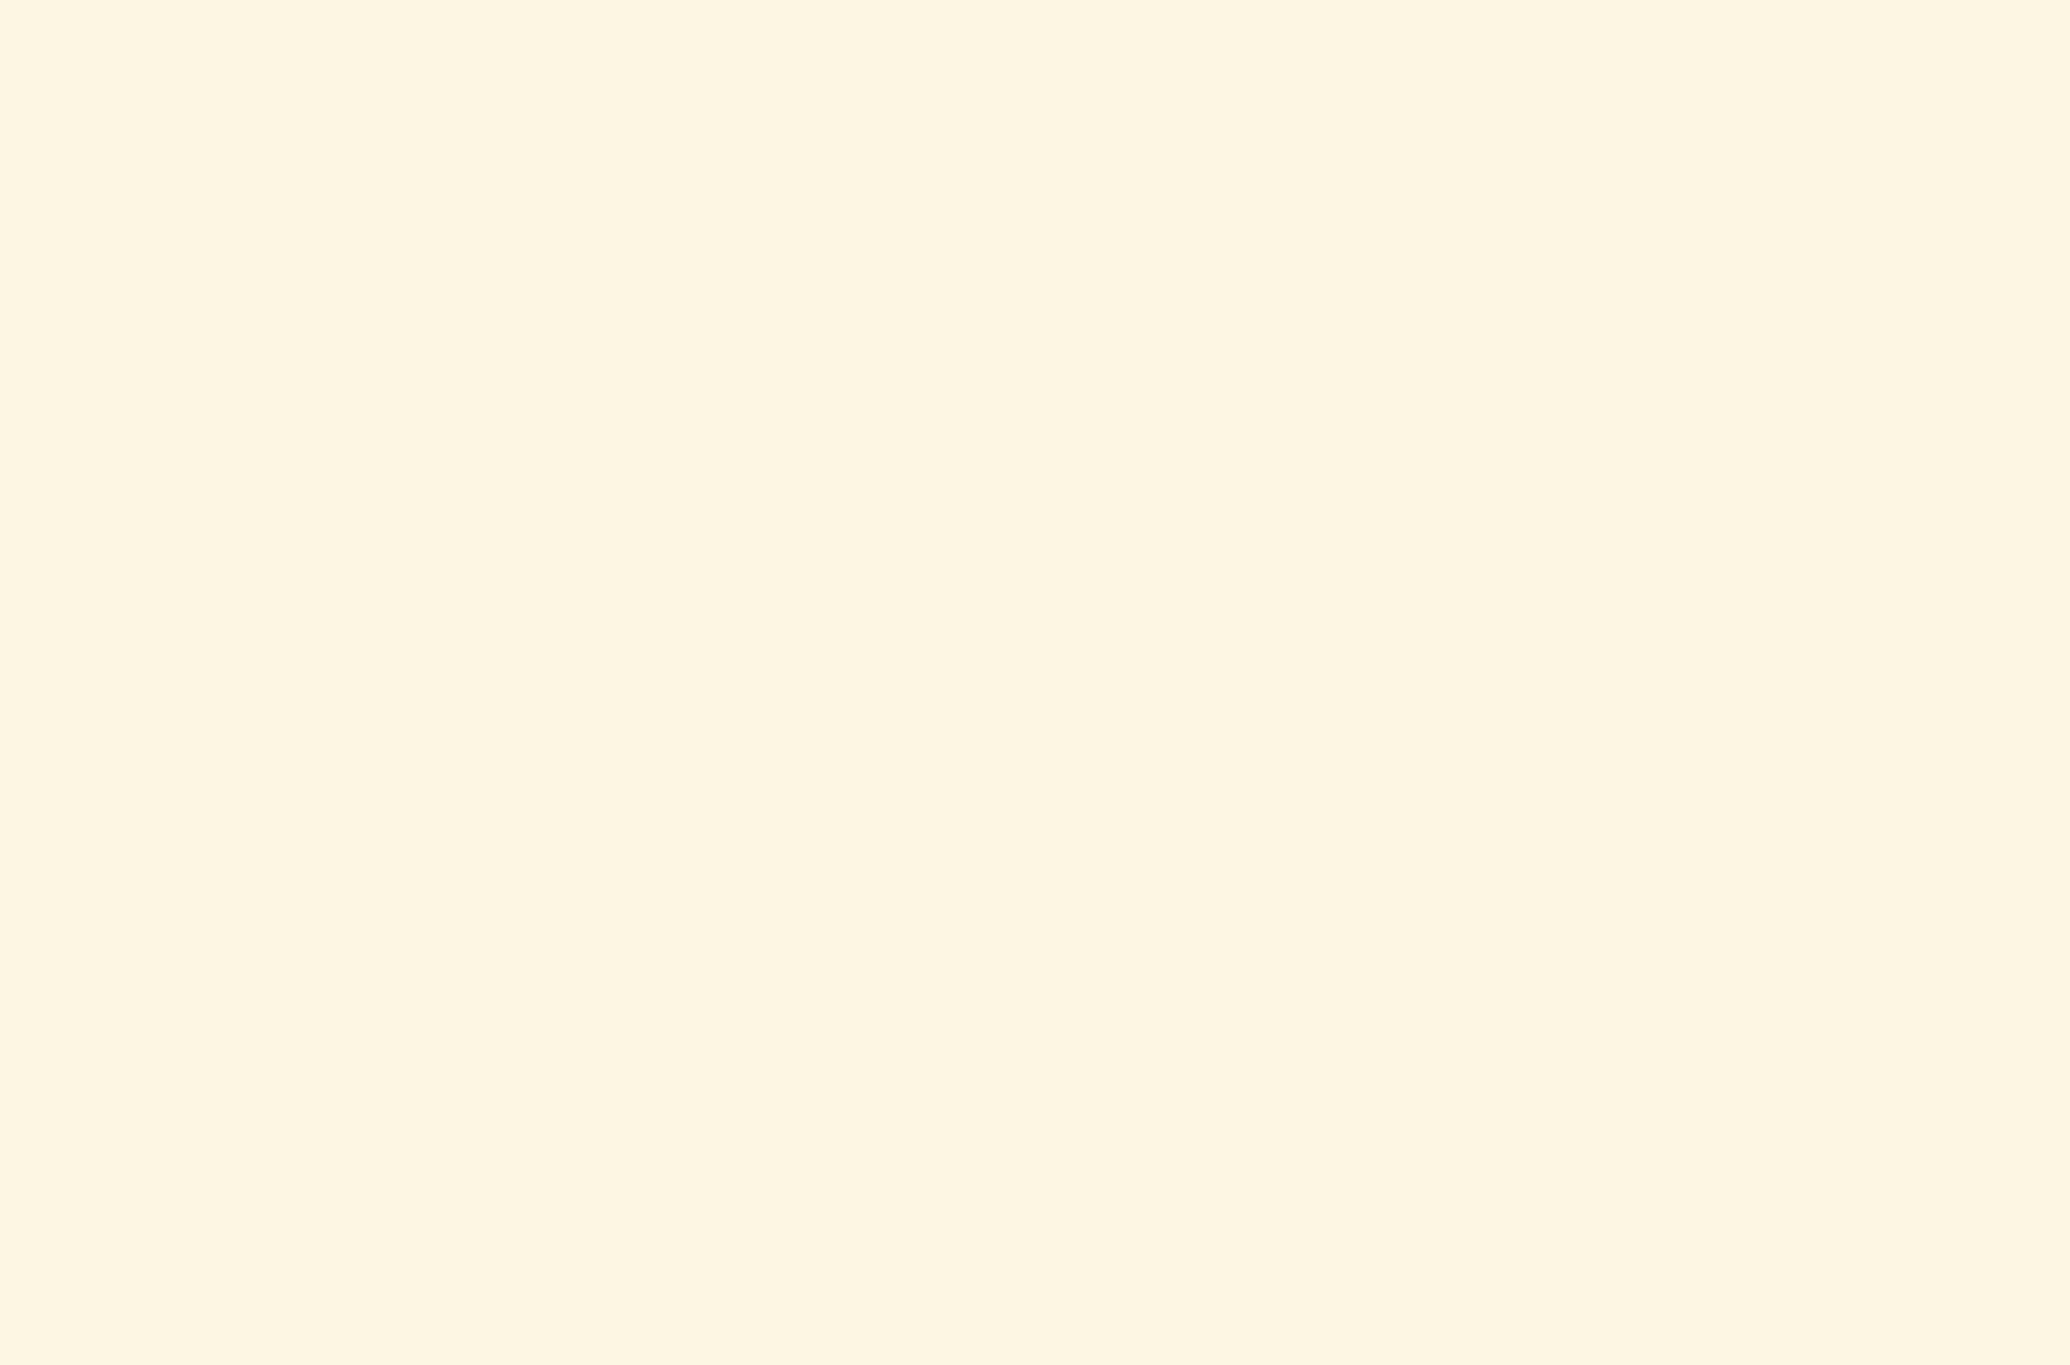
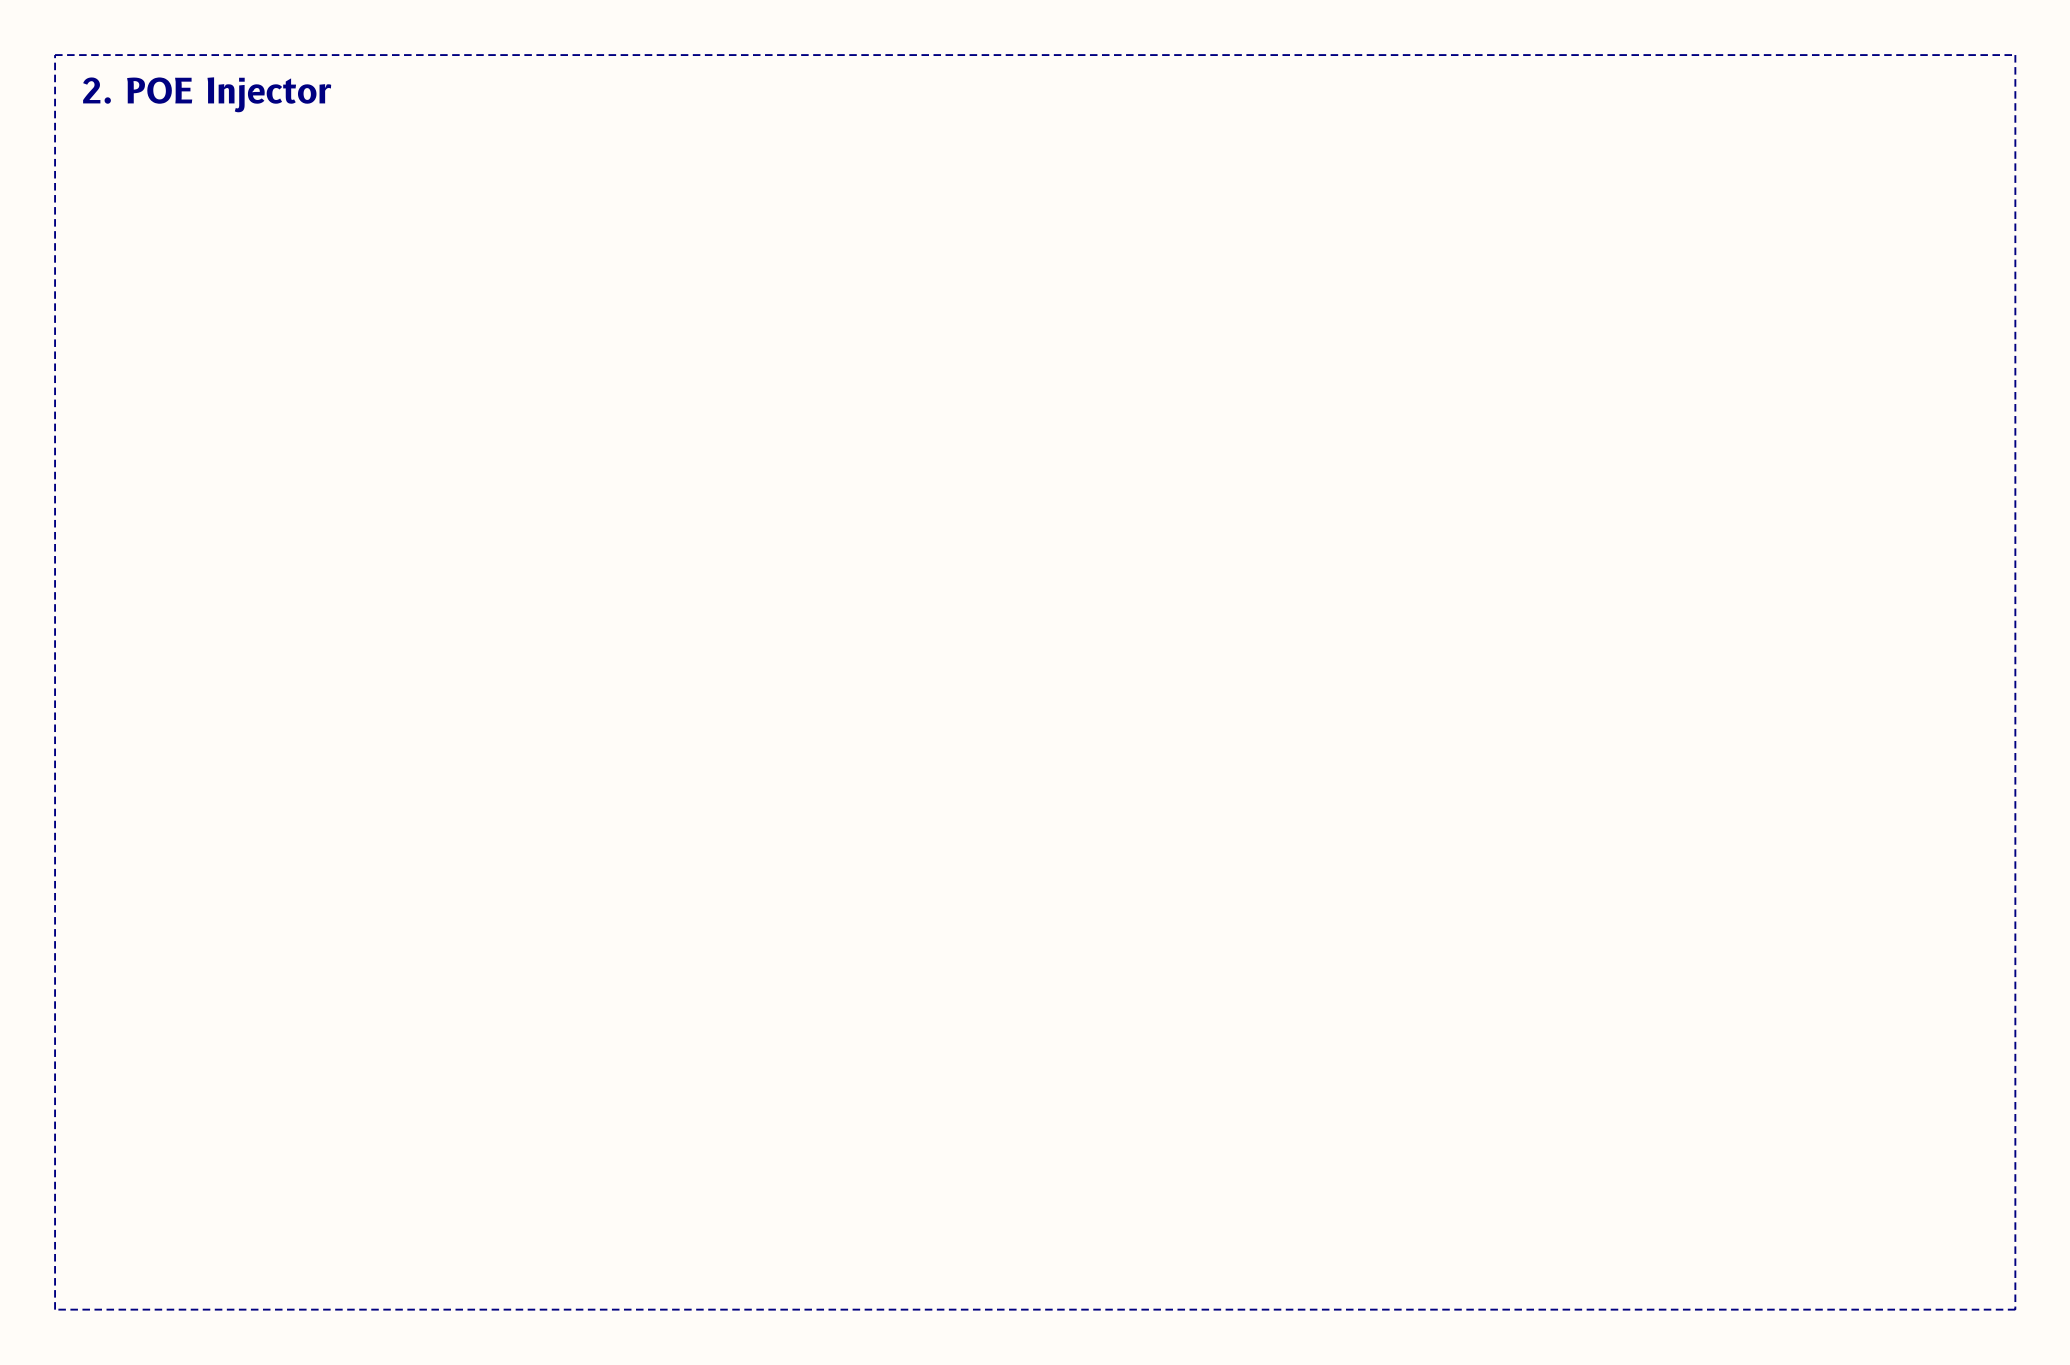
line: none -> (55, 55) (2015, 55) (2015, 1309) (55, 1309) (55, 55)
text: none -> 2. POE Injector (207, 94)

